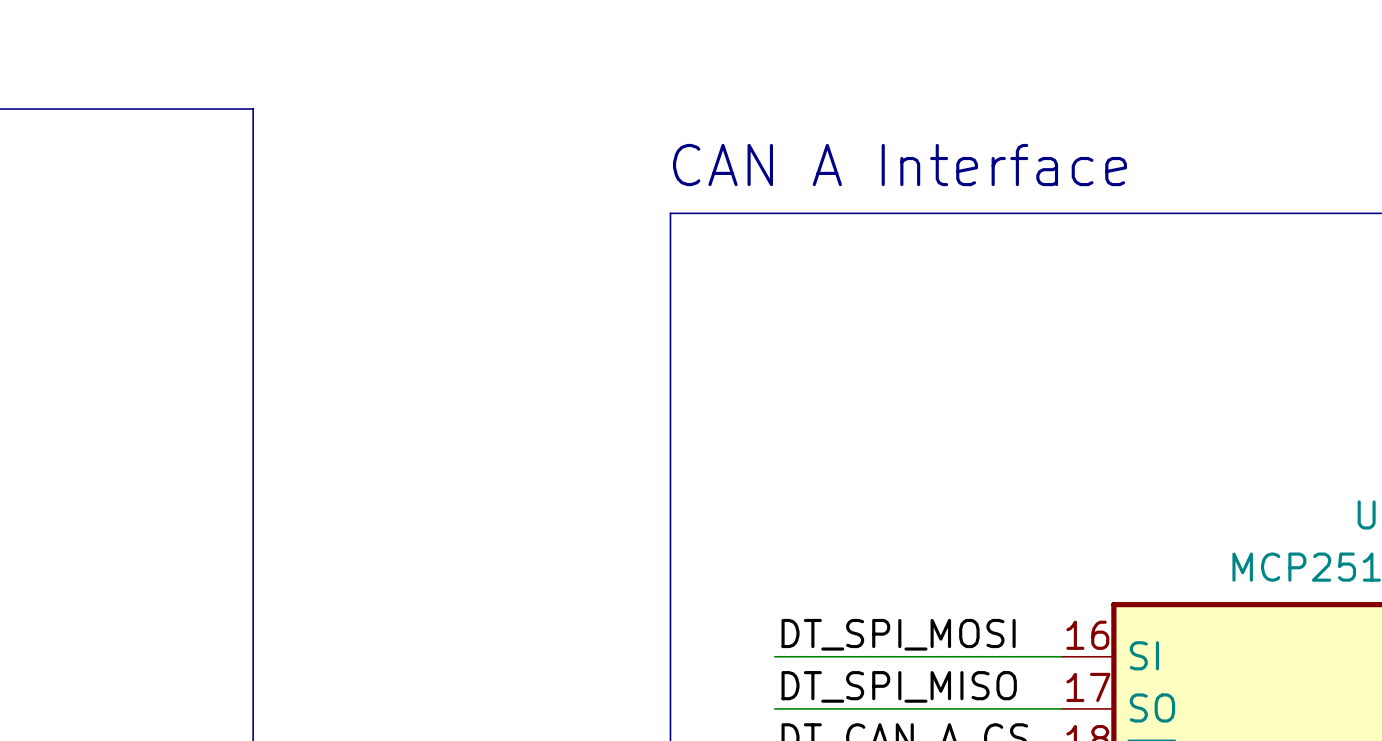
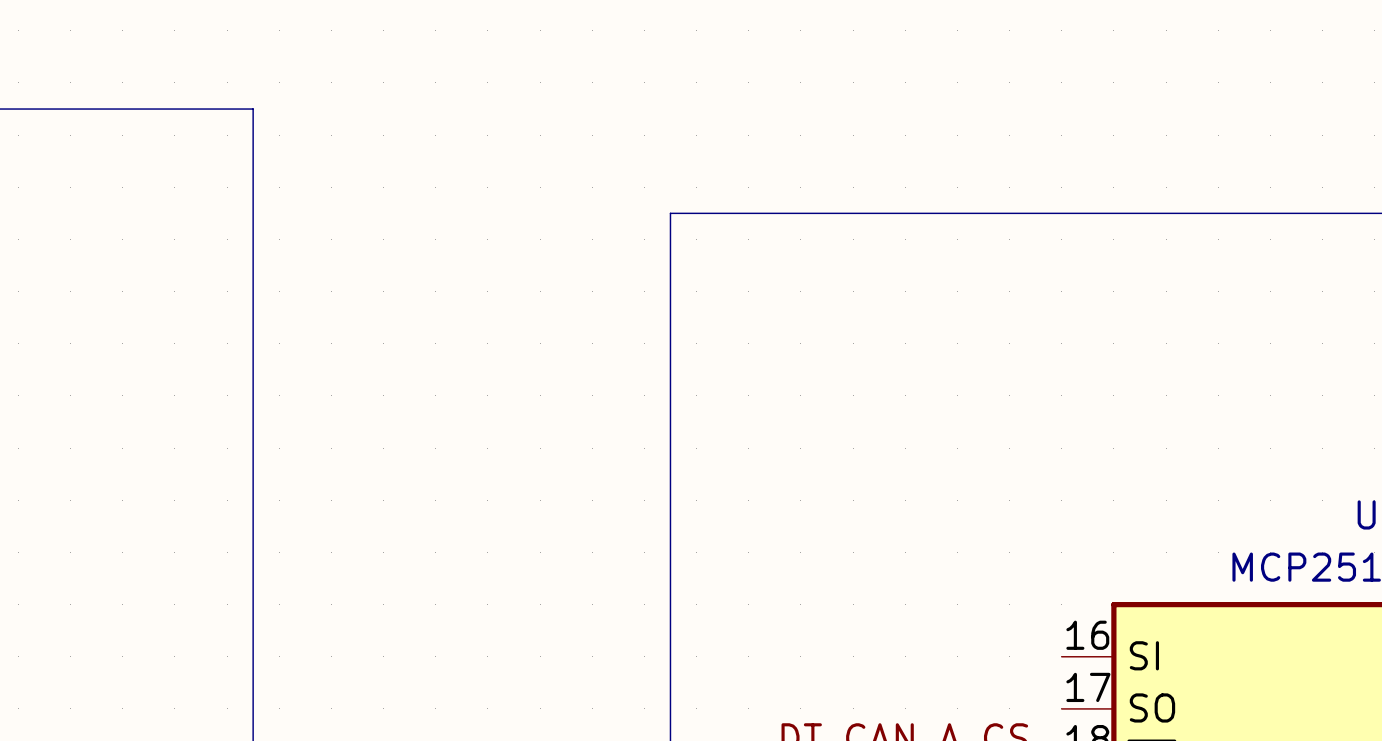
text: CAN A Interface (900, 165) -> none
label: DT_SPI_MOSI (898, 634) -> none
wire: (774, 656) (1061, 656) -> none
label: DT_SPI_MISO (899, 686) -> none
wire: (774, 708) (1061, 708) -> none

